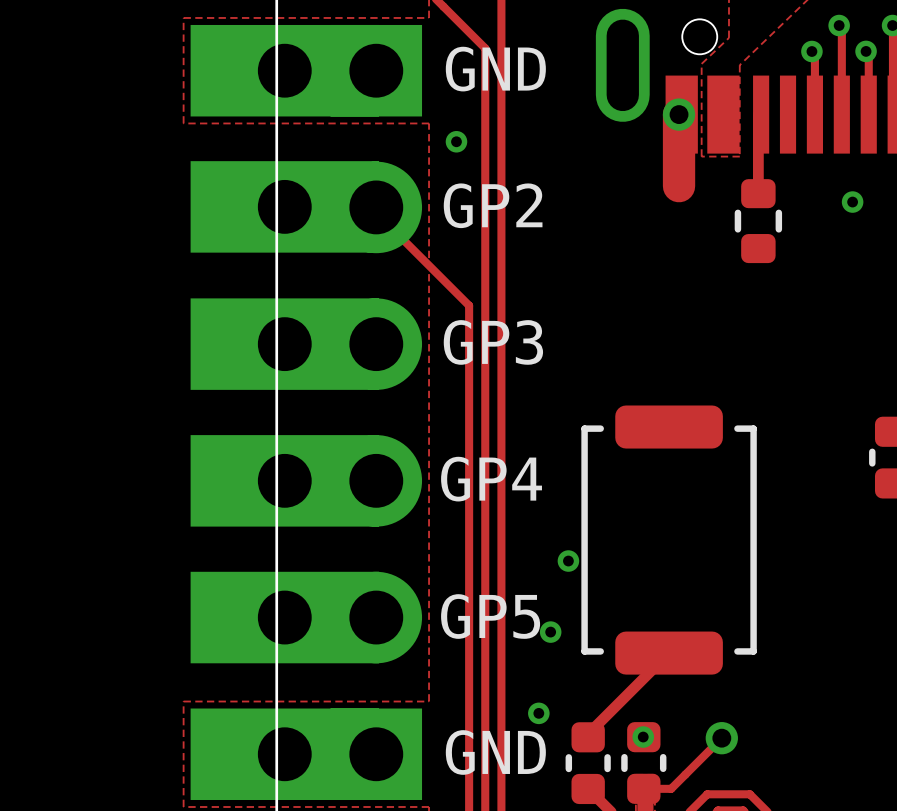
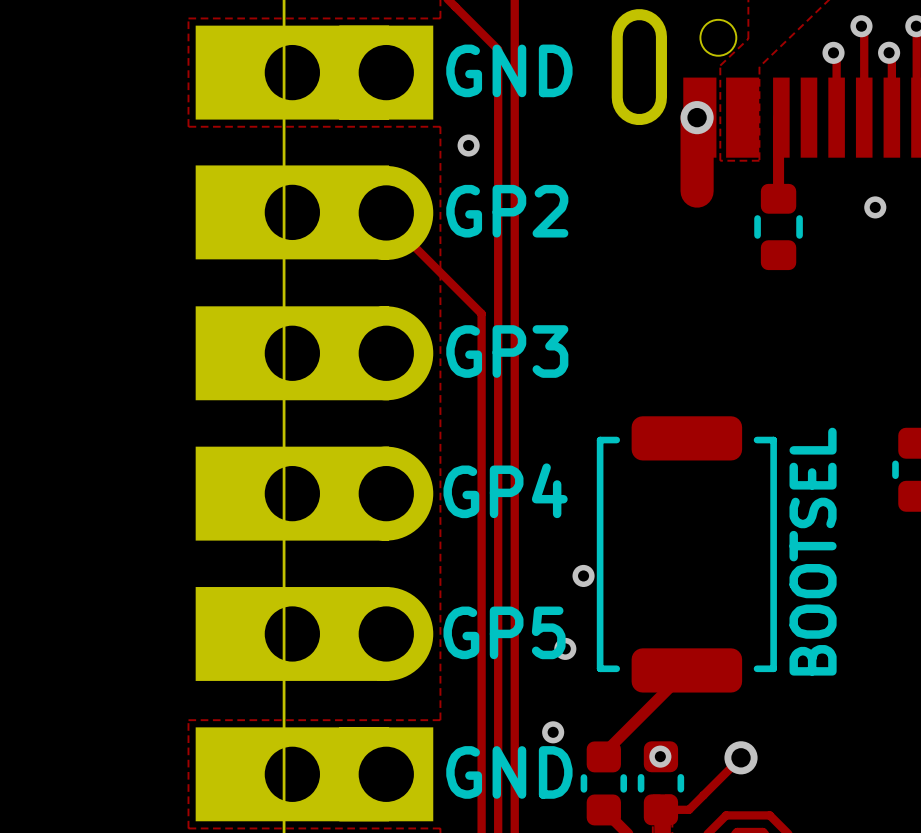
text: none -> BOOTSEL (813, 551)

